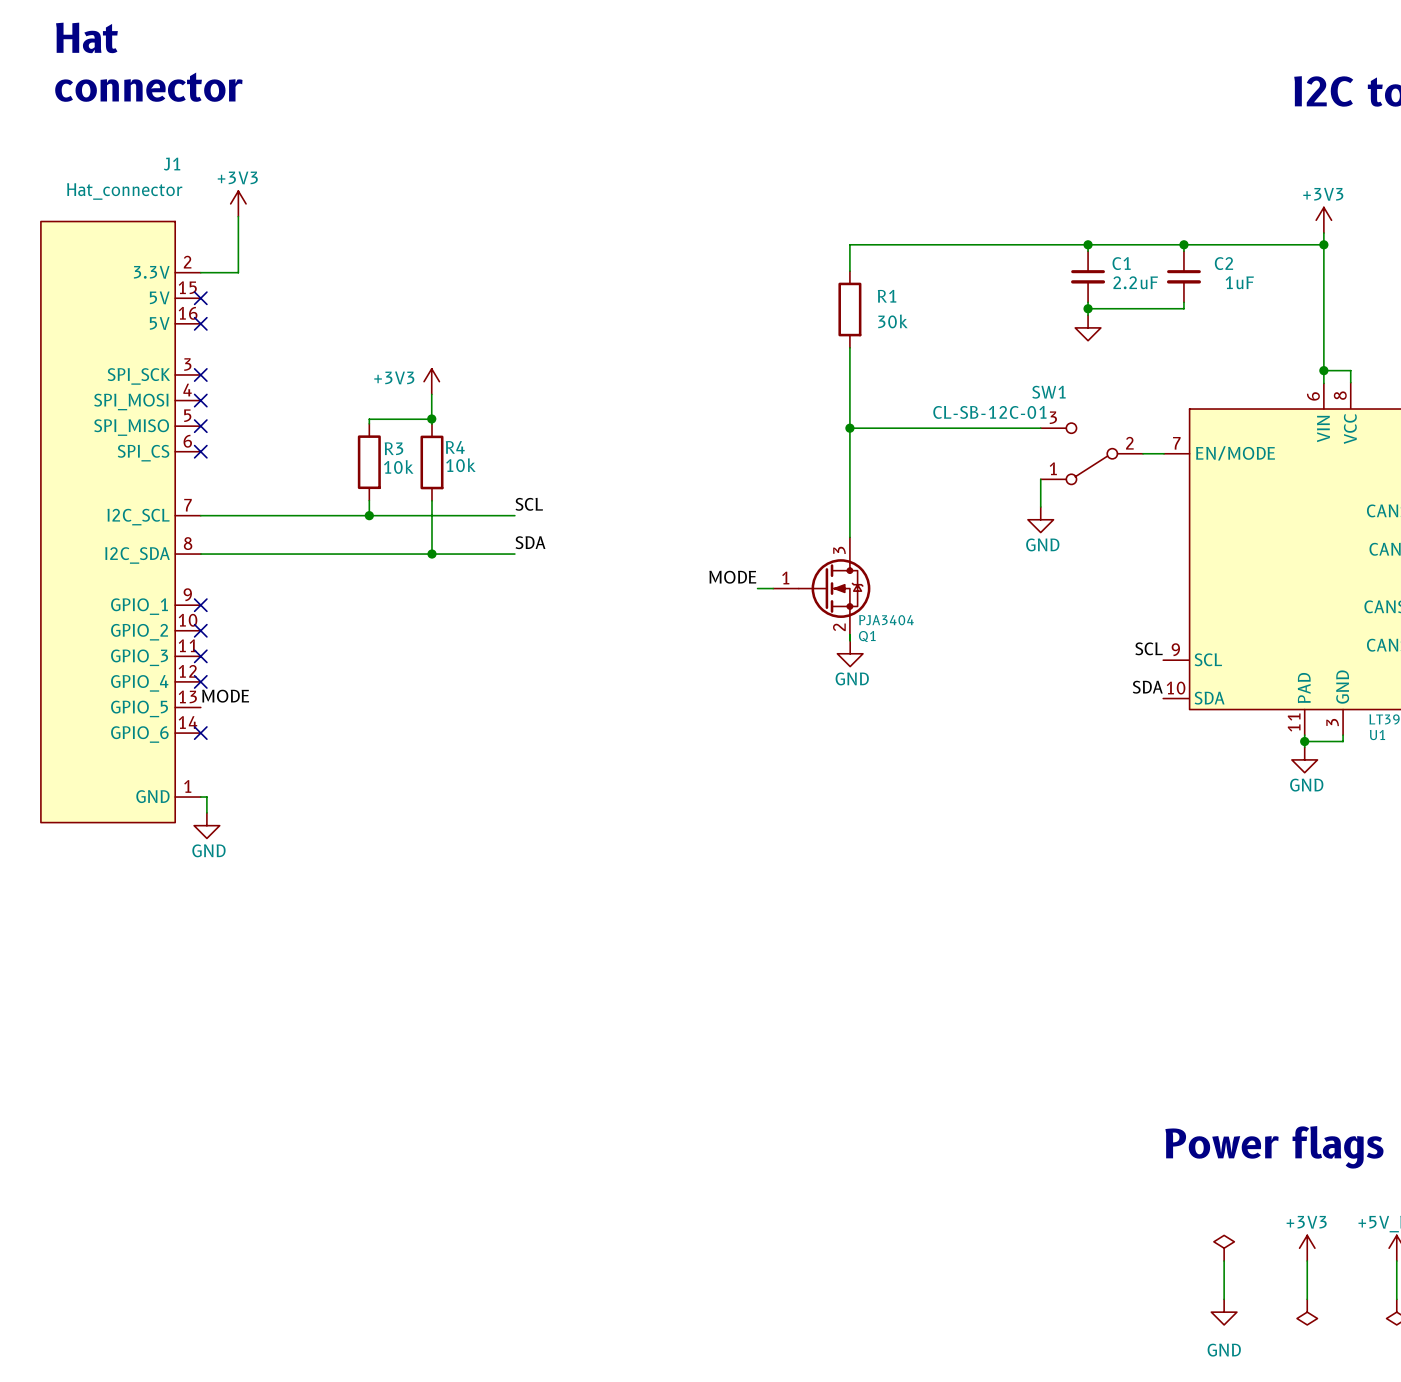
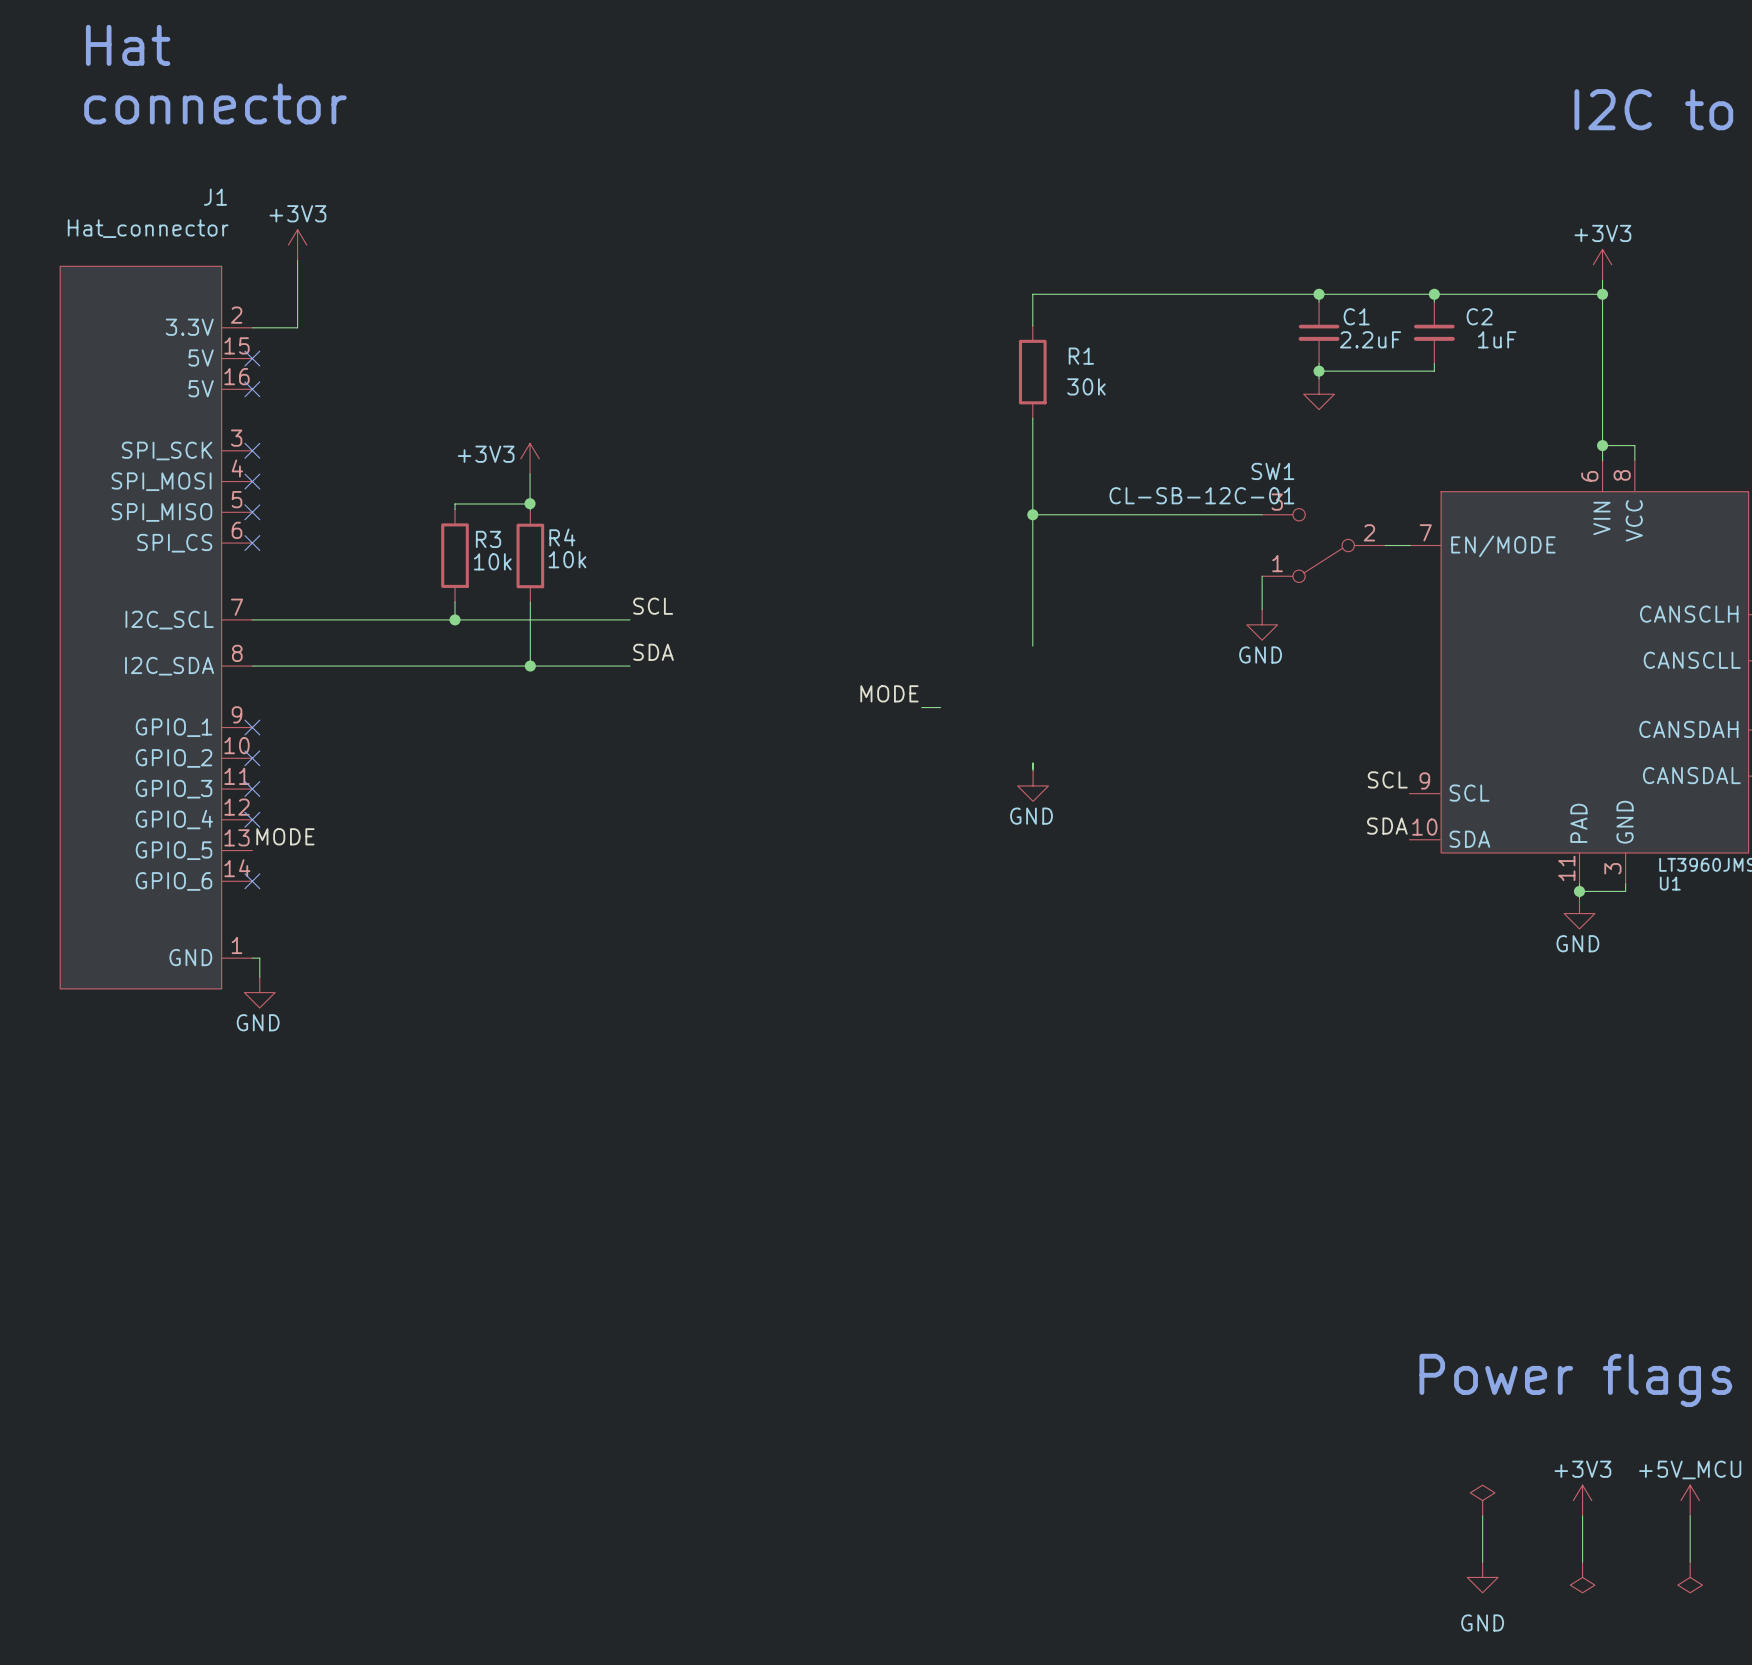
Q1: PJA3404 (821, 588) -> none

